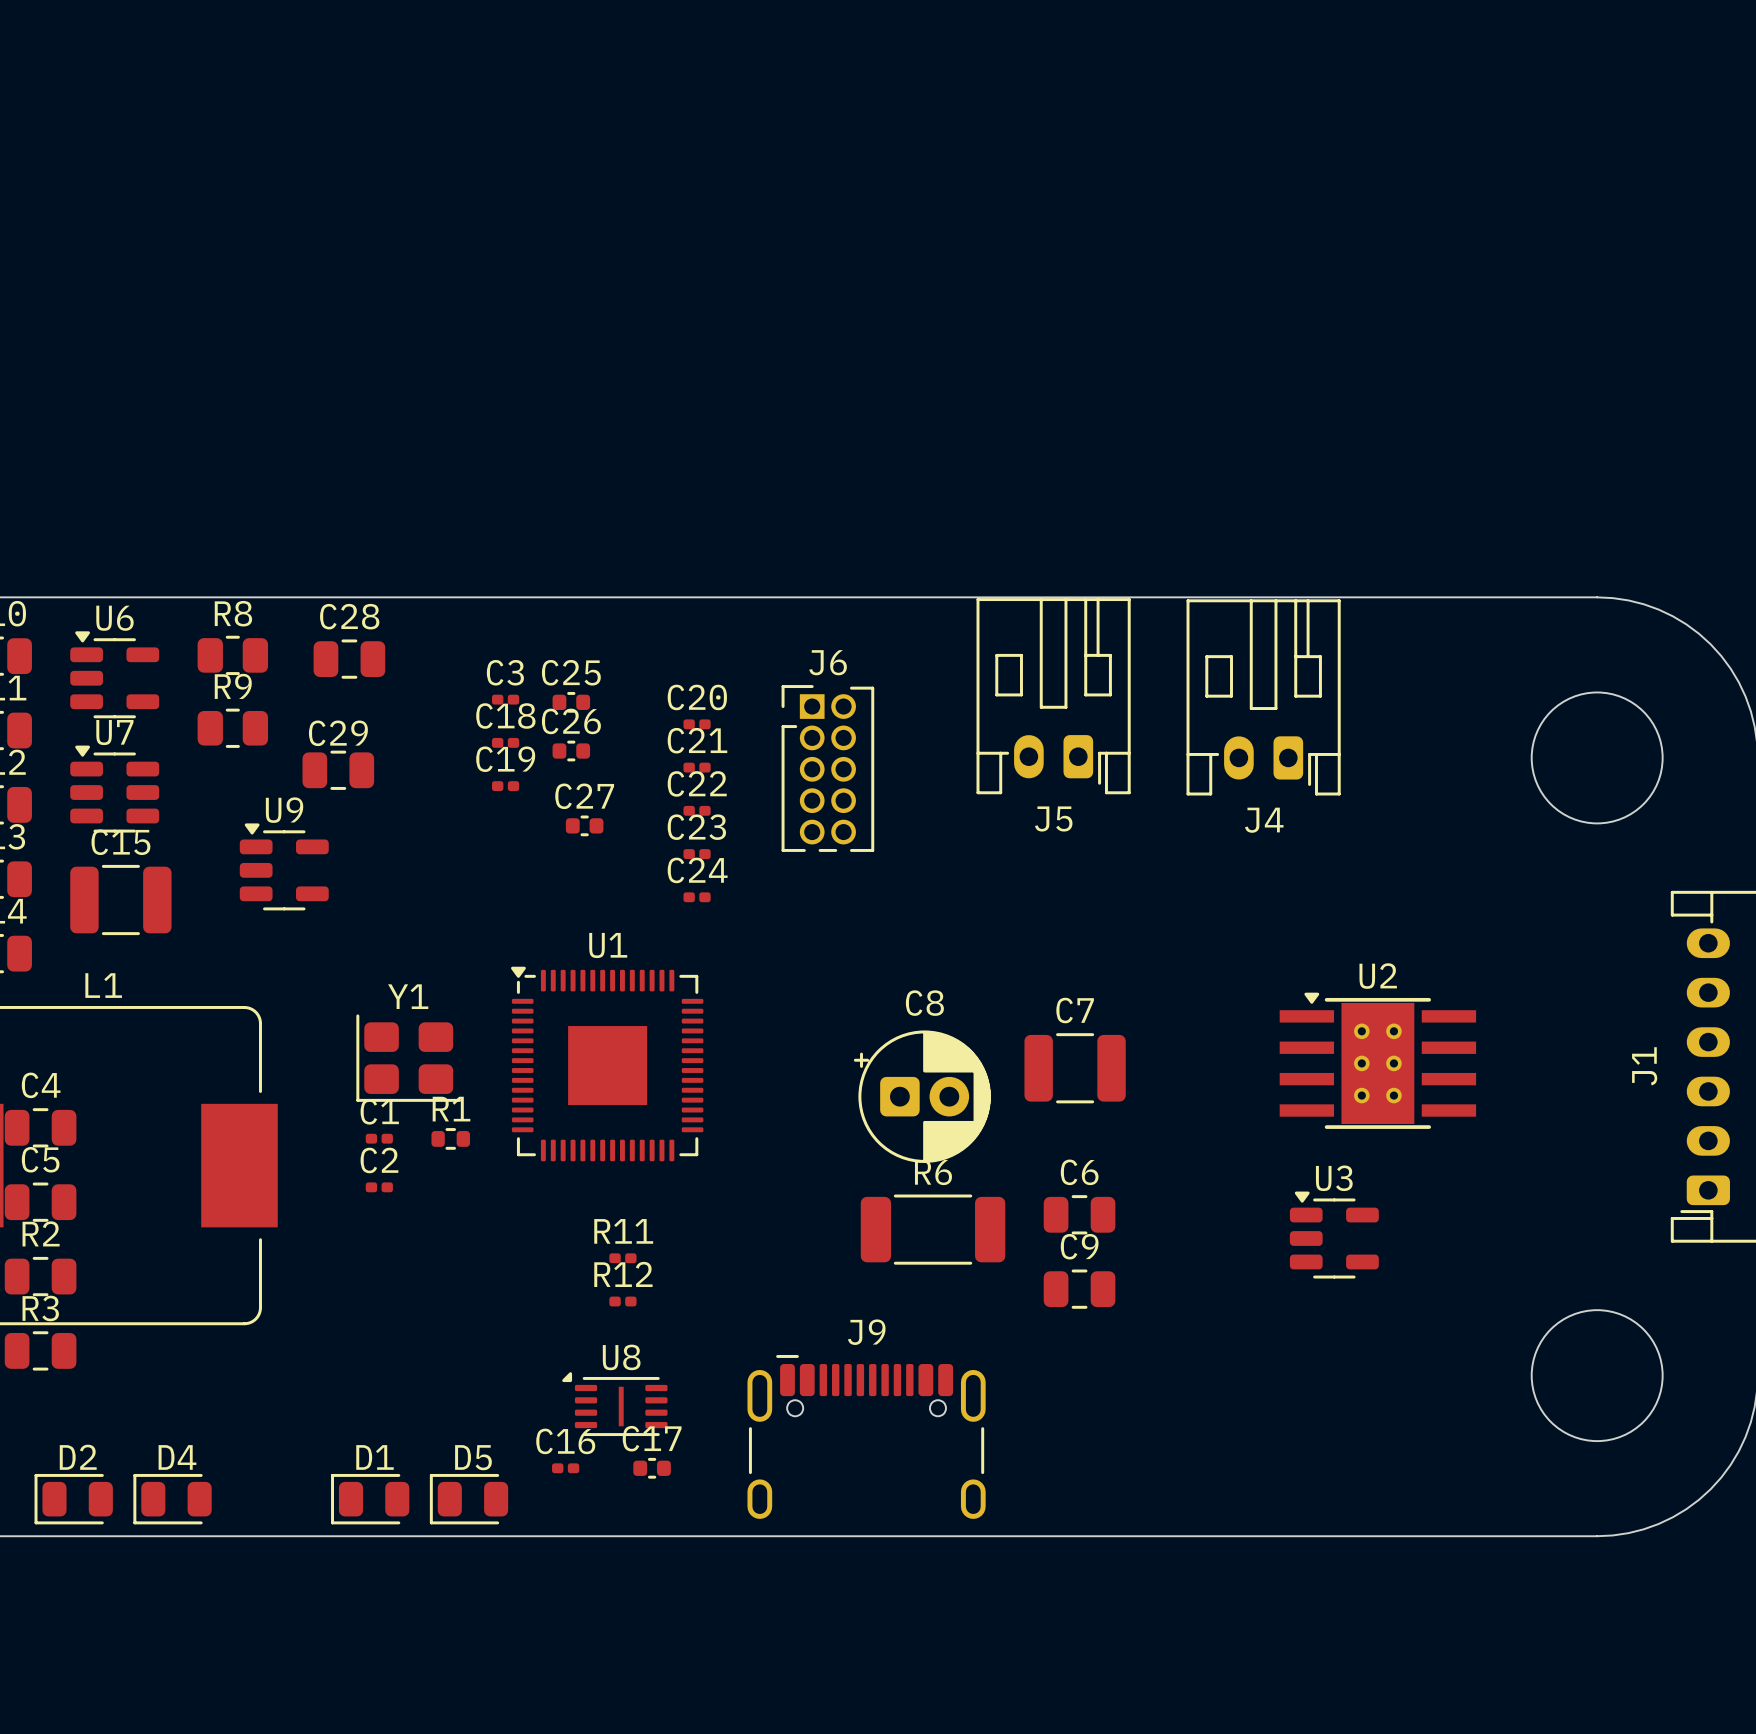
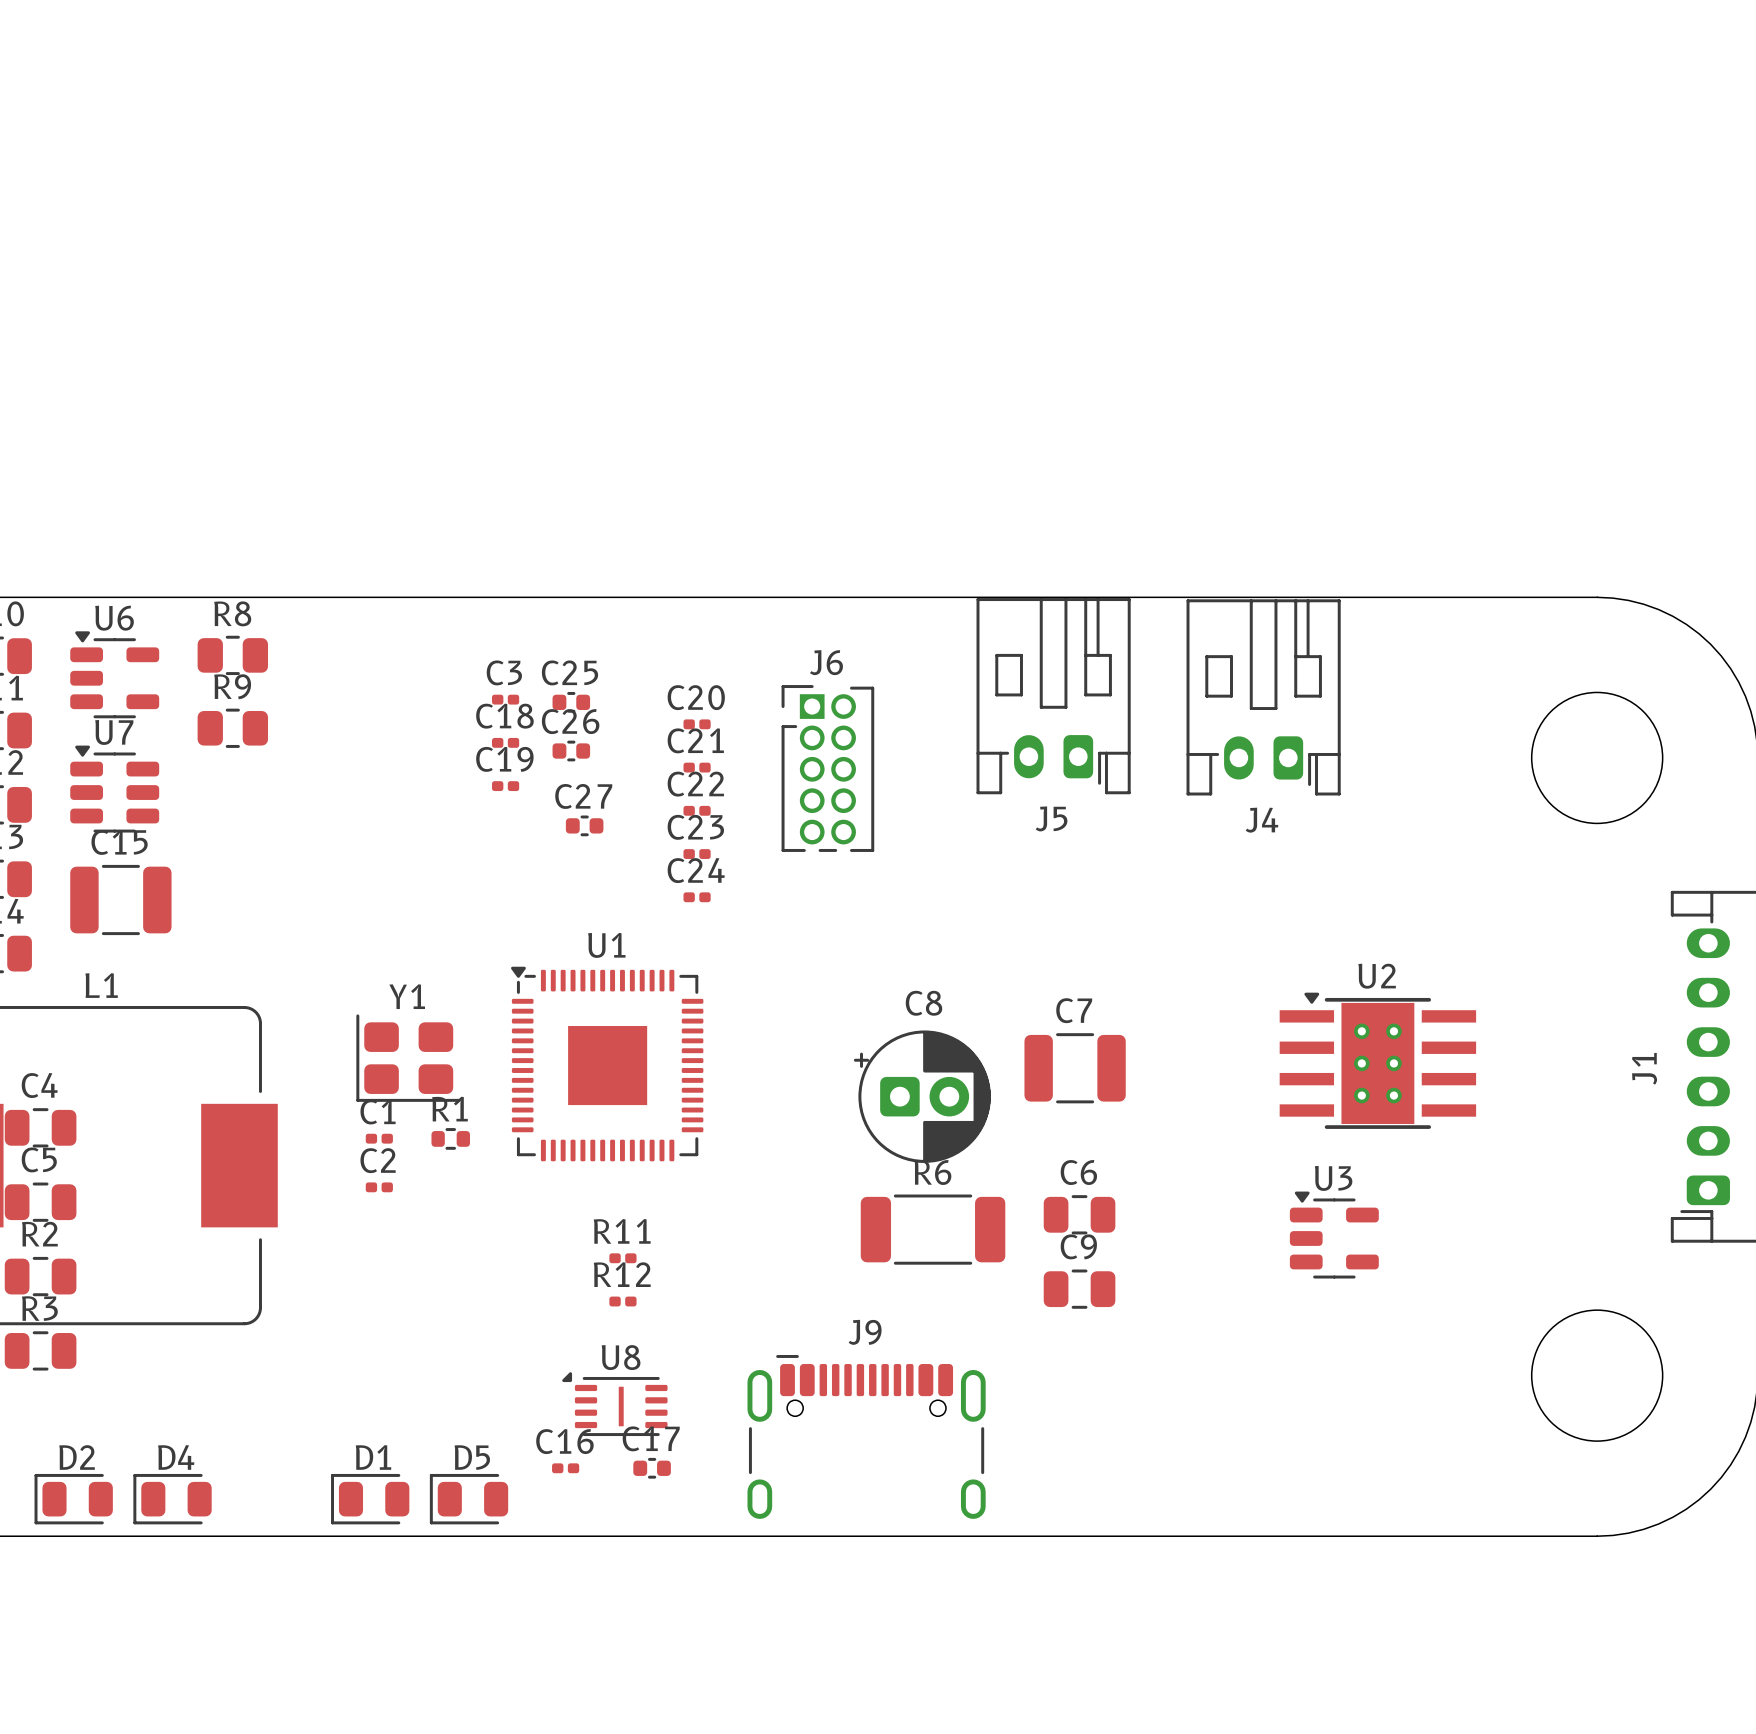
C28: (349, 659) -> none
C29: (338, 770) -> none
U9: (284, 866) -> none

